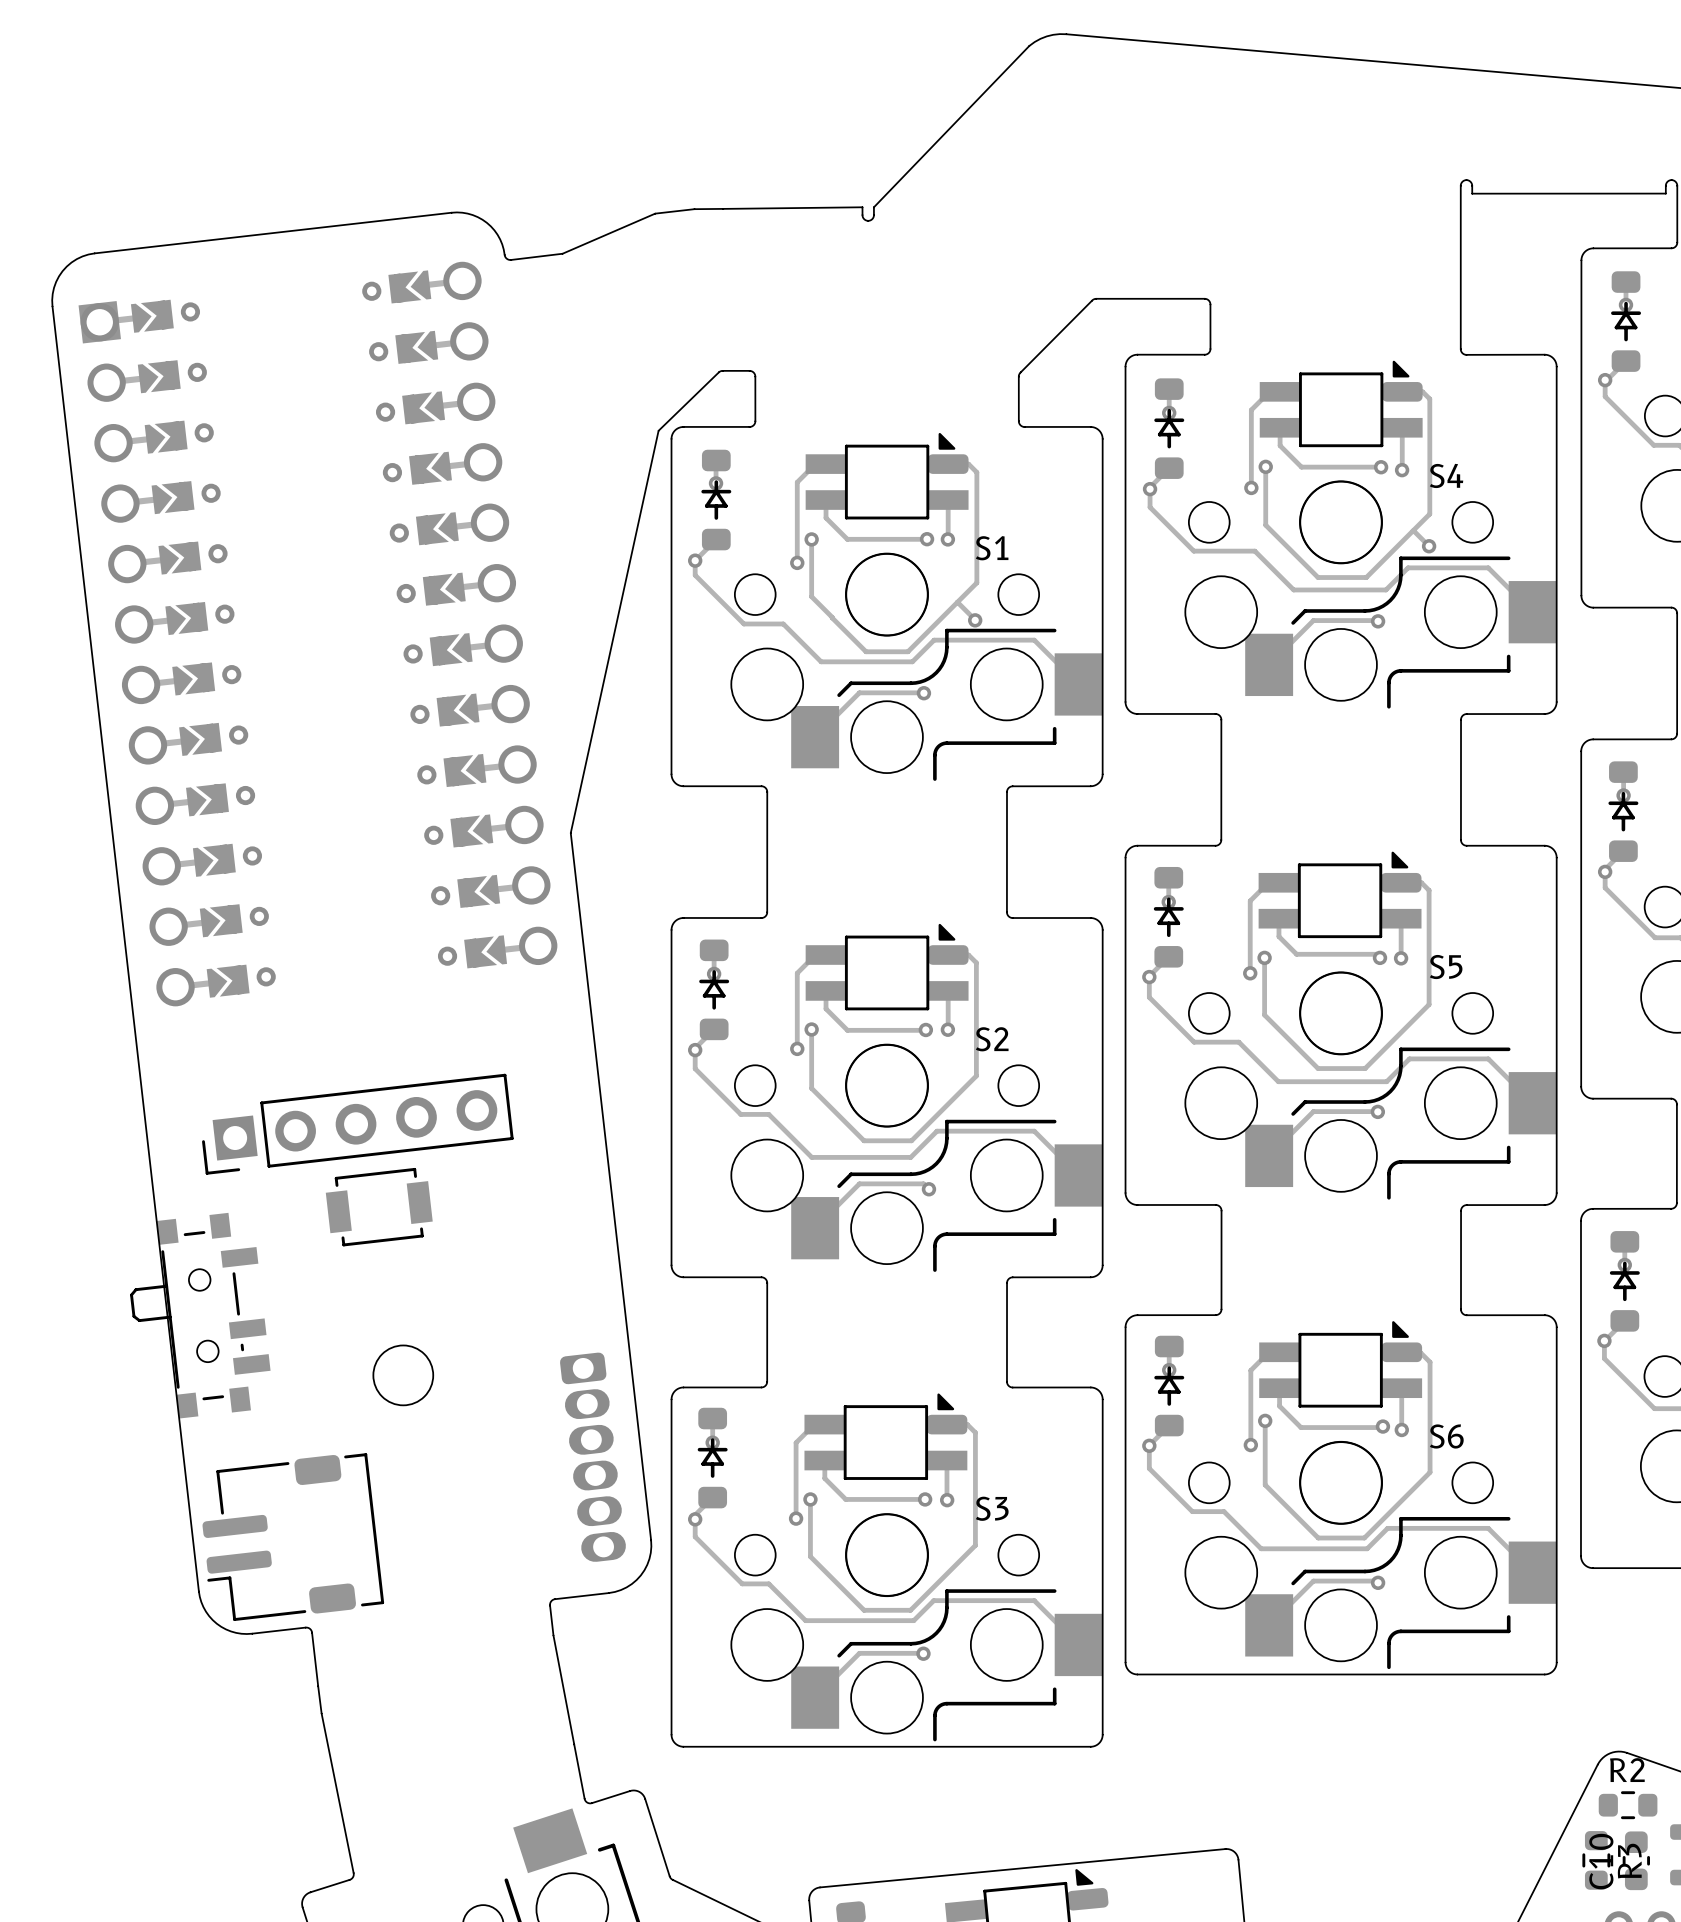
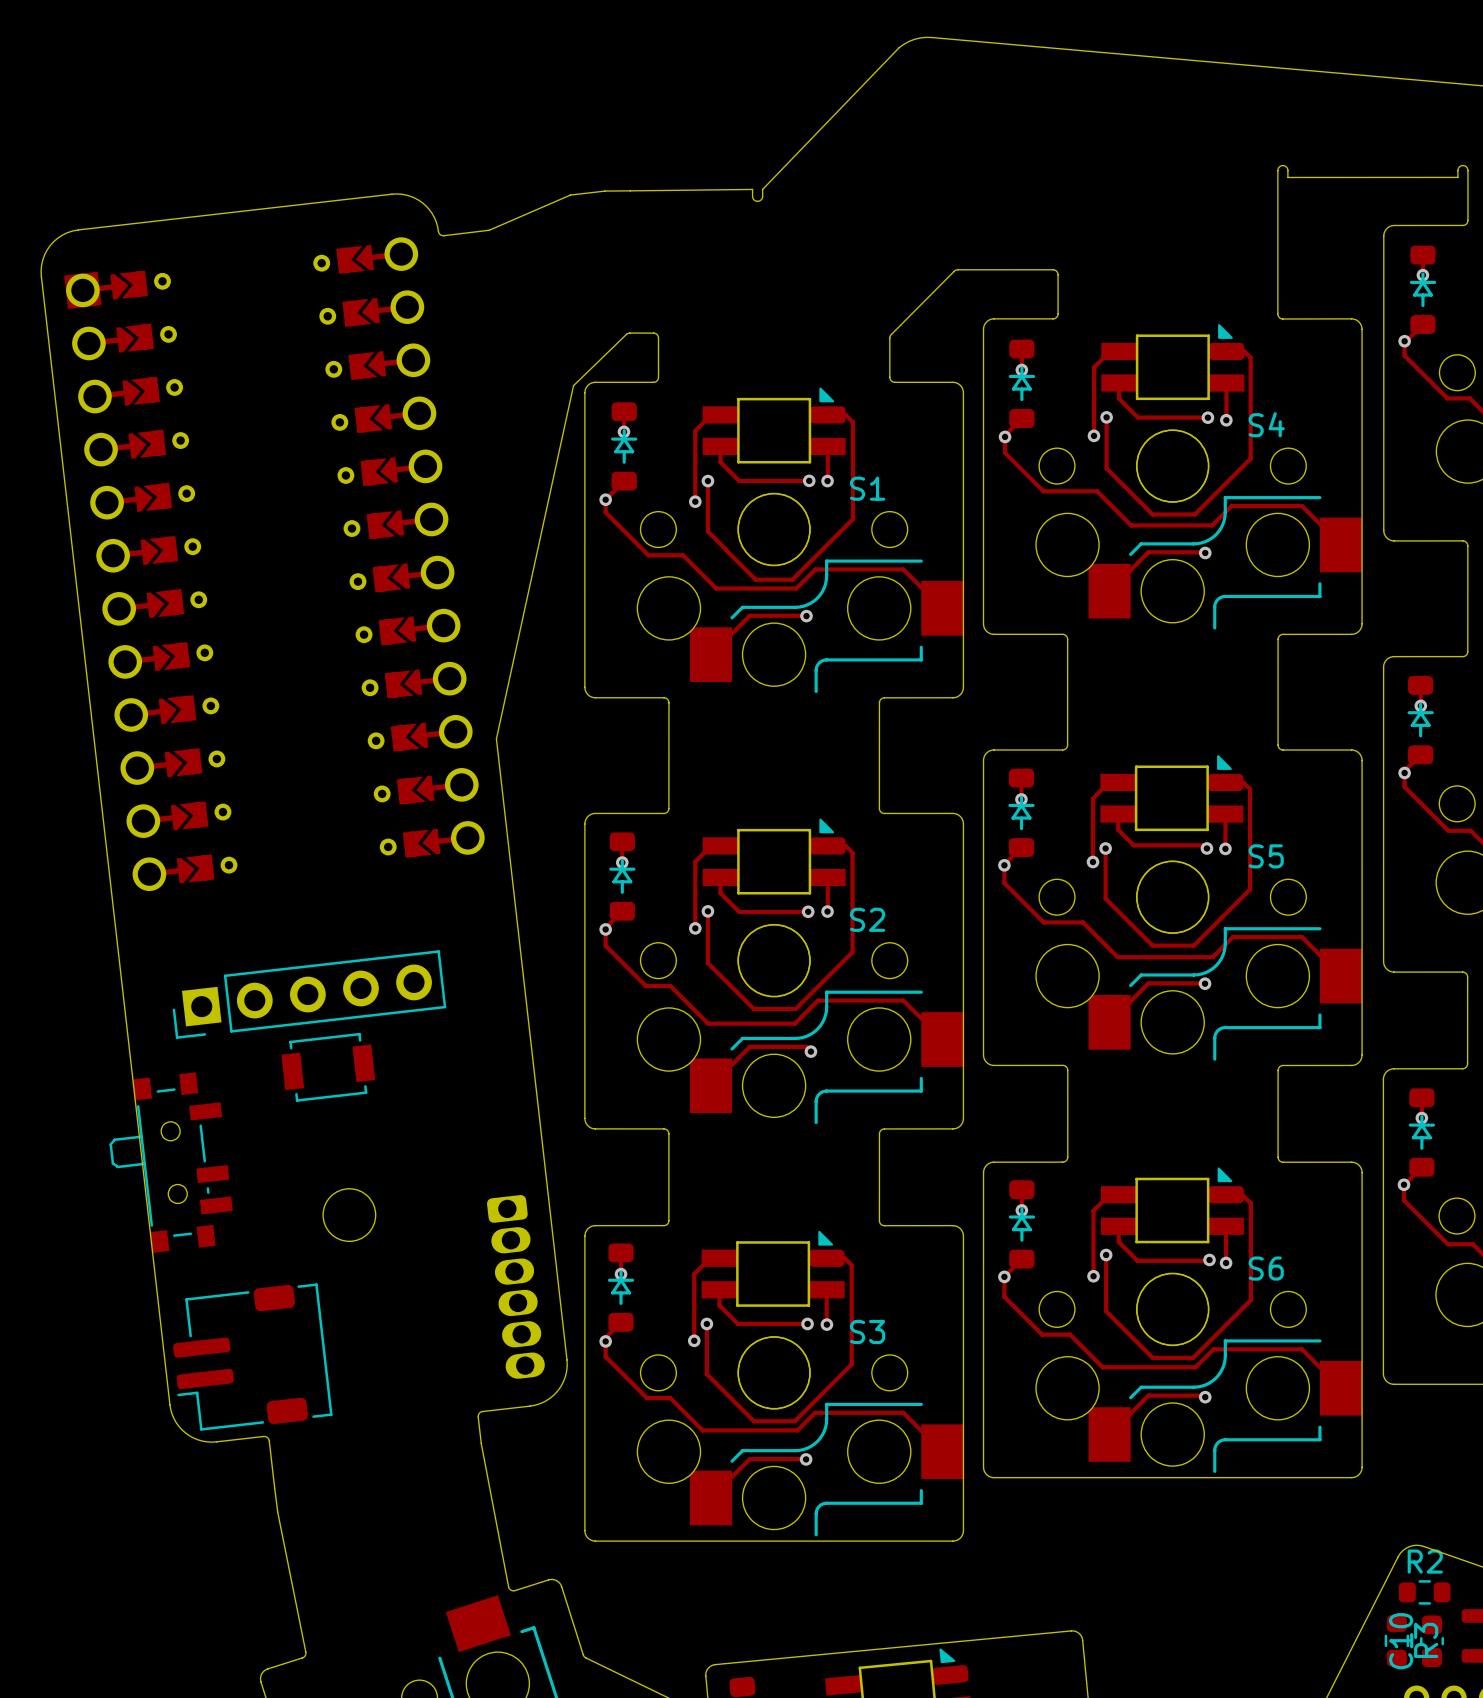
track: (1412, 530) (1429, 546) -> none
via: (1429, 546) -> none
track: (957, 602) (975, 619) -> none
via: (975, 620) -> none

